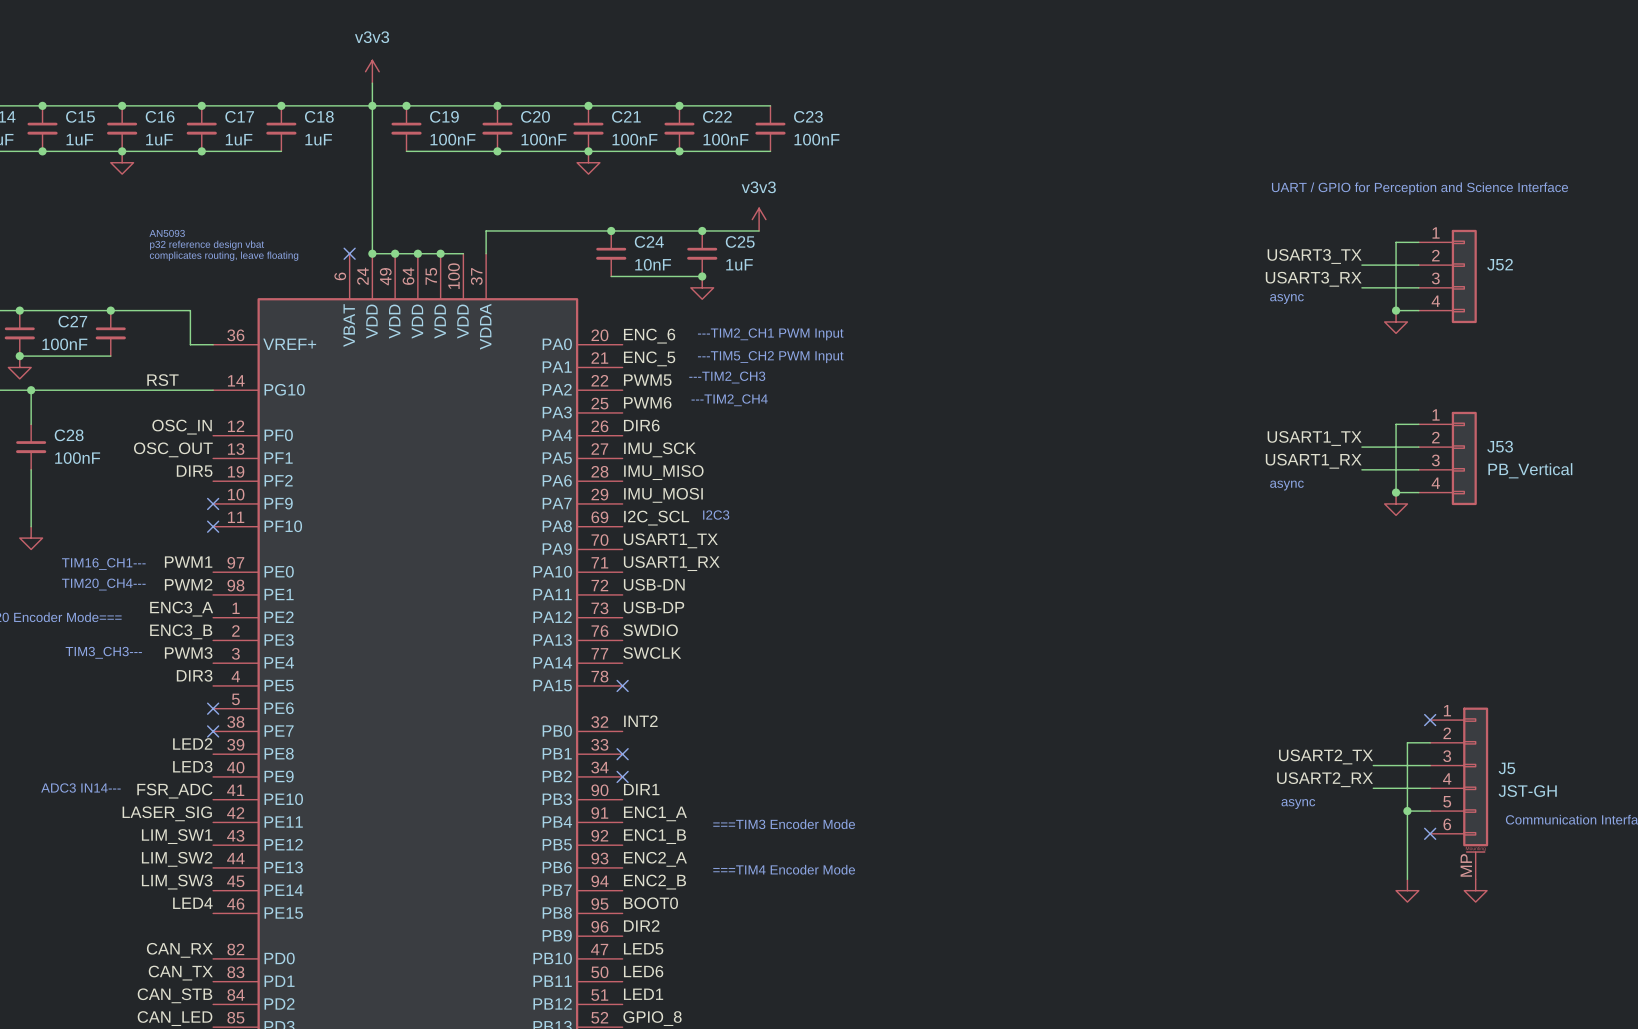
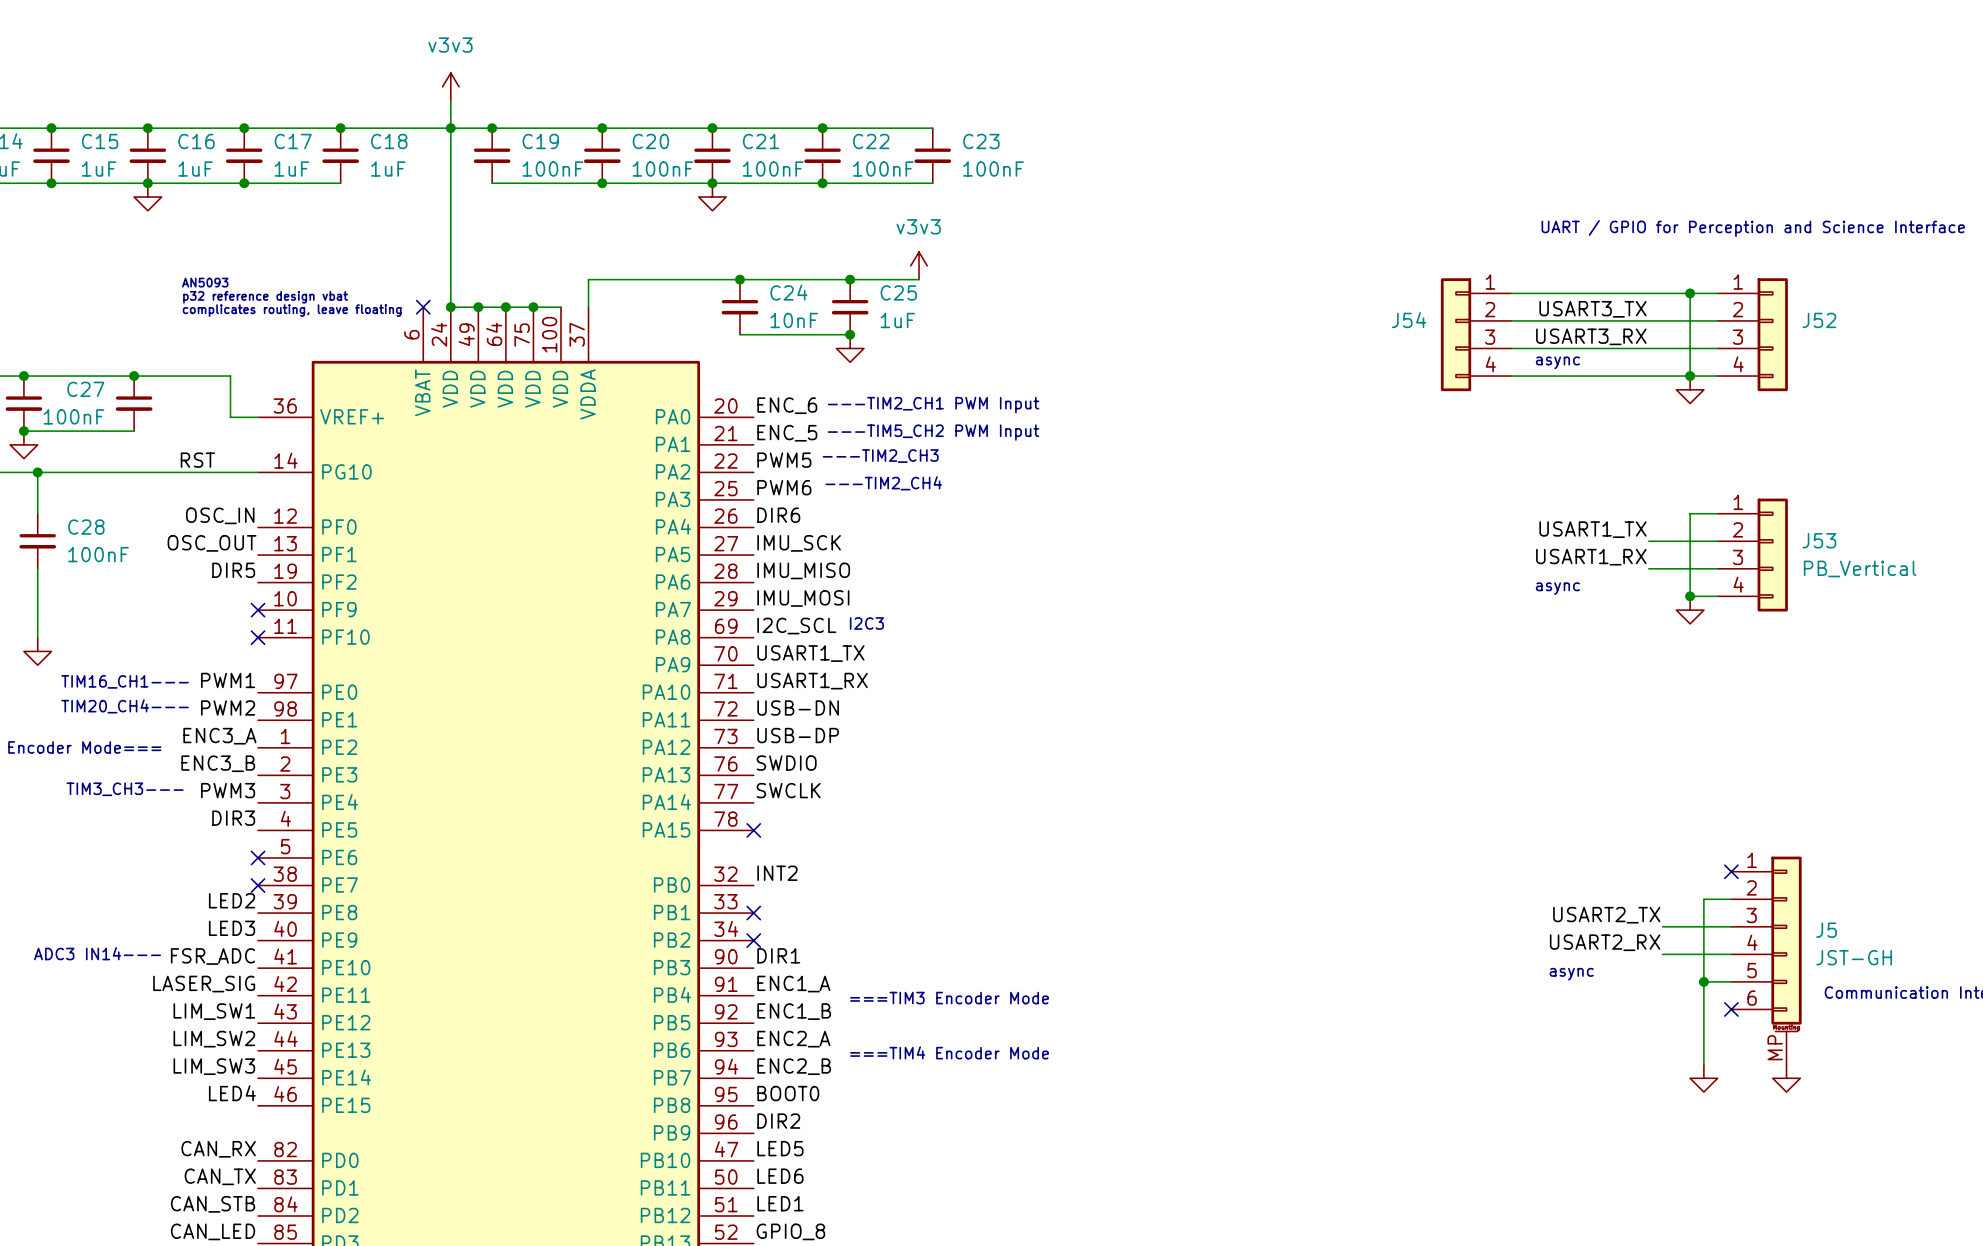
wire: none -> (1511, 293) (1690, 293)
junction: none -> (1690, 293)
wire: none -> (1511, 320) (1648, 320)
J54: none -> (1475, 334)
wire: none -> (1511, 348) (1648, 348)
wire: none -> (1511, 376) (1690, 376)

